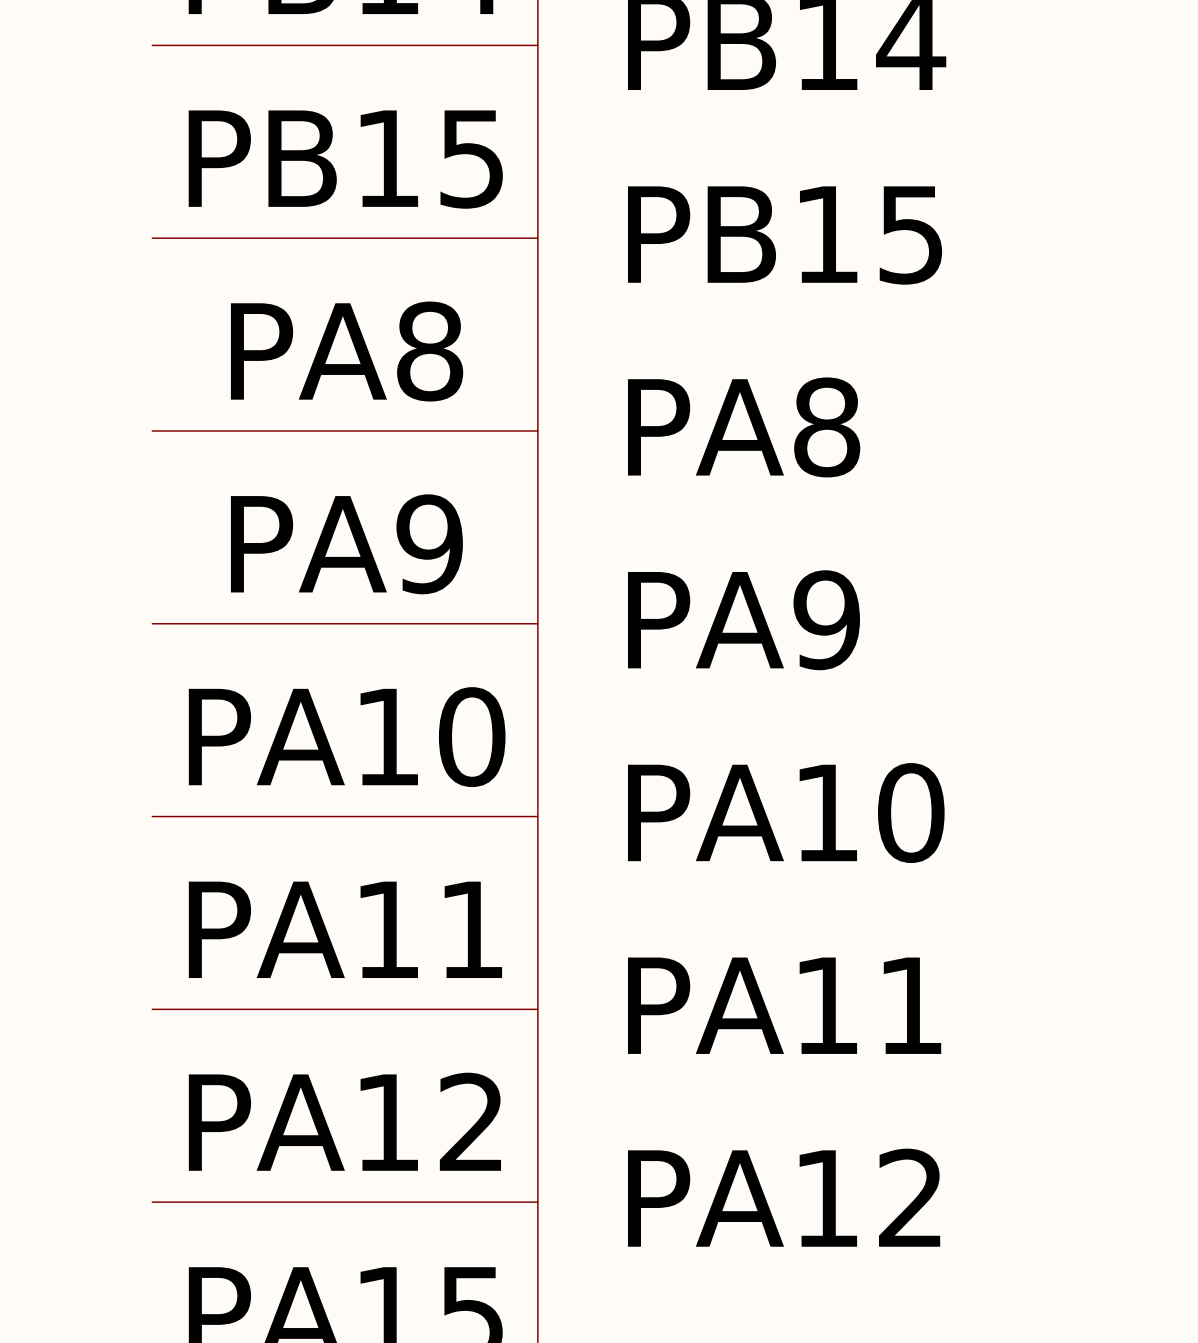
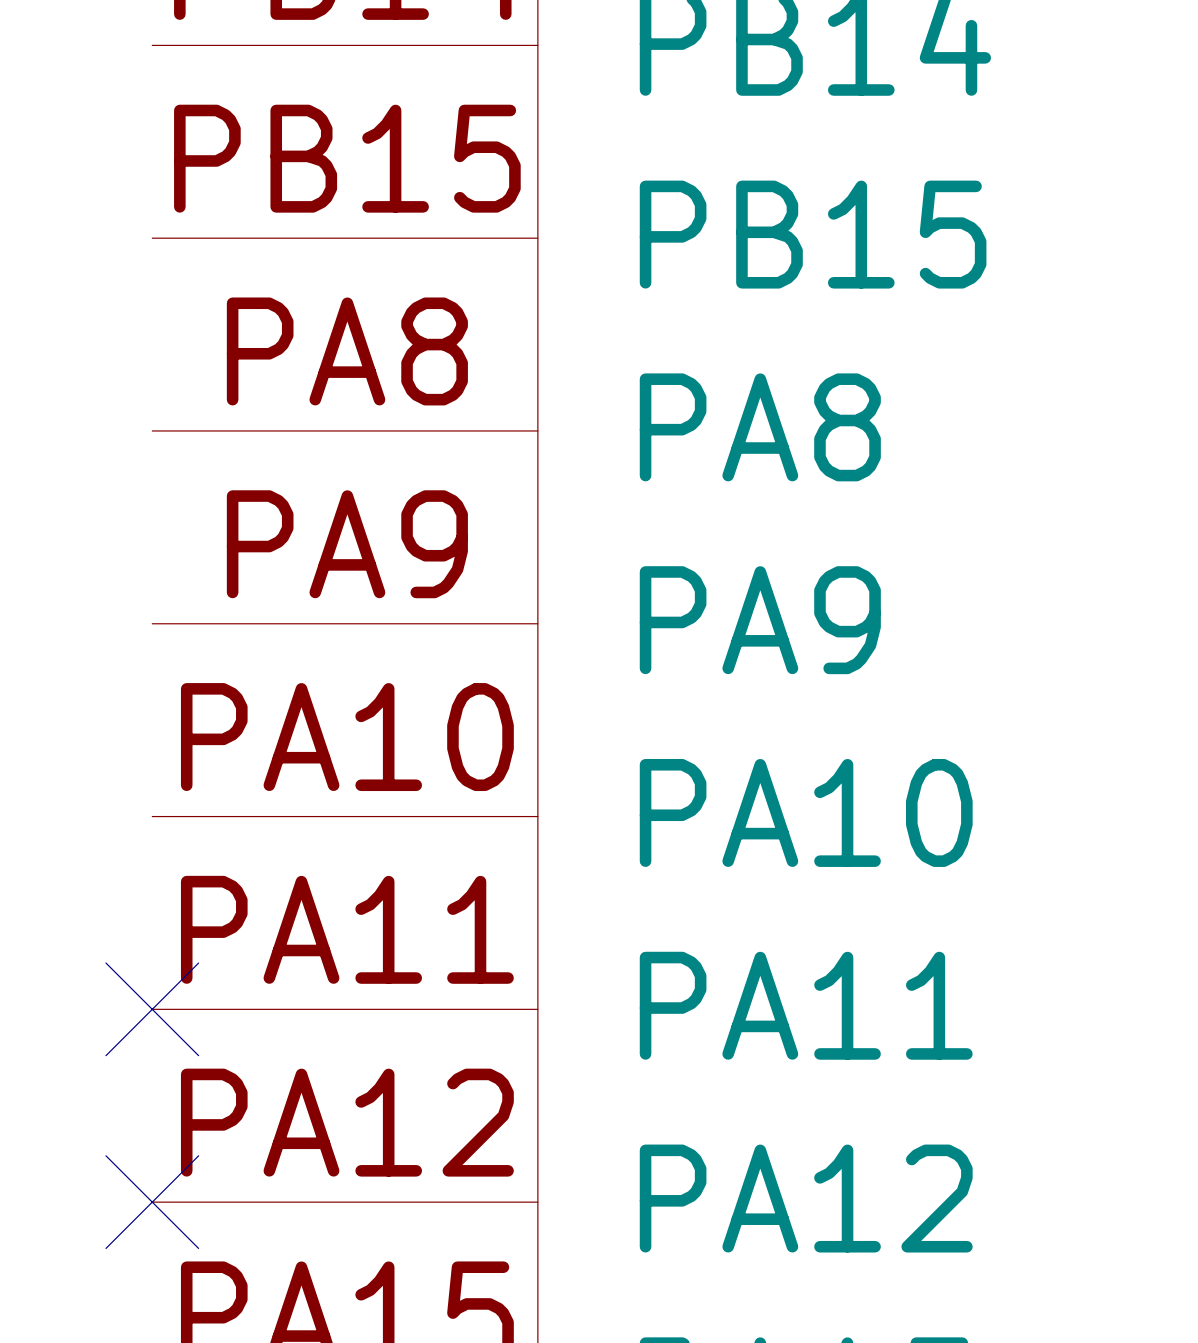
no-connect mark: none -> (152, 1009)
no-connect mark: none -> (152, 1202)

